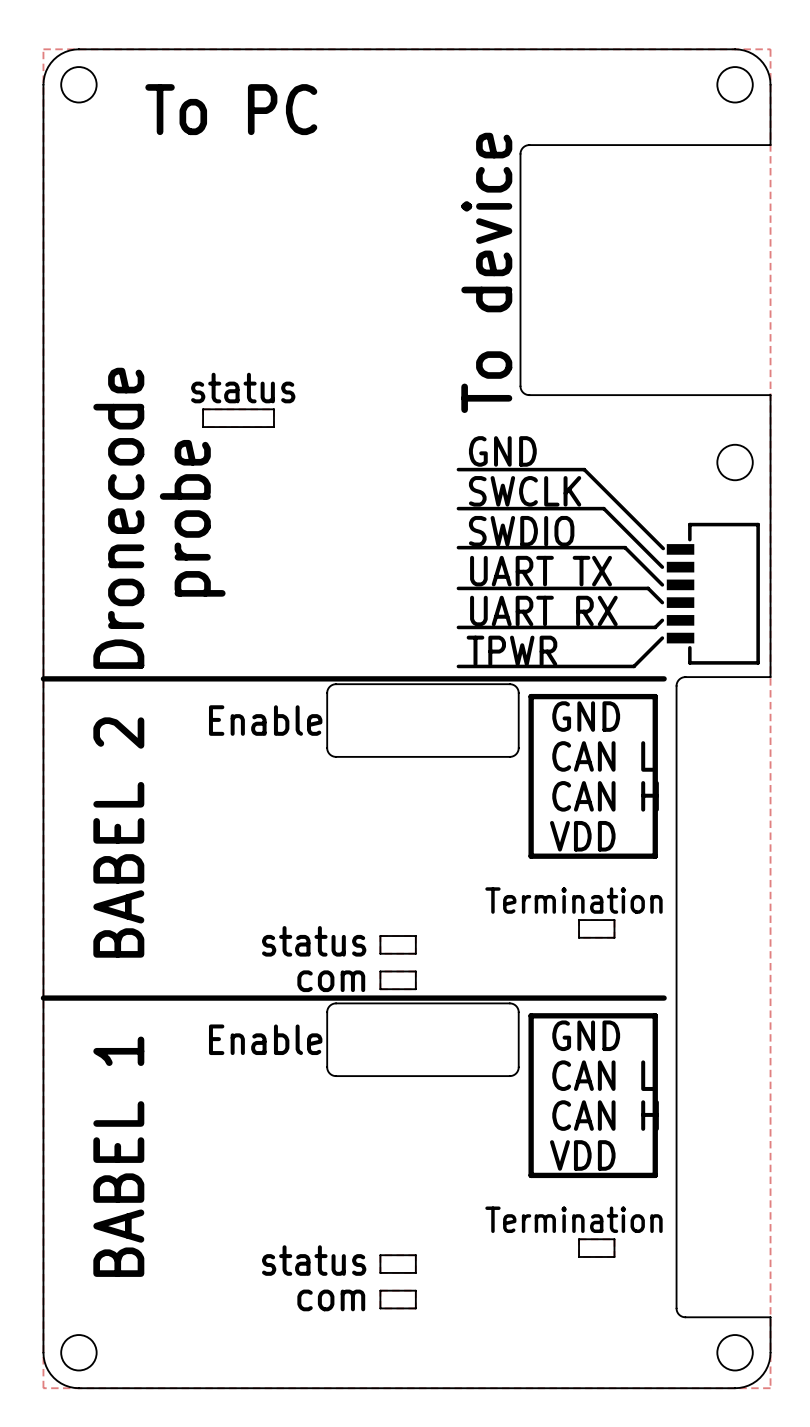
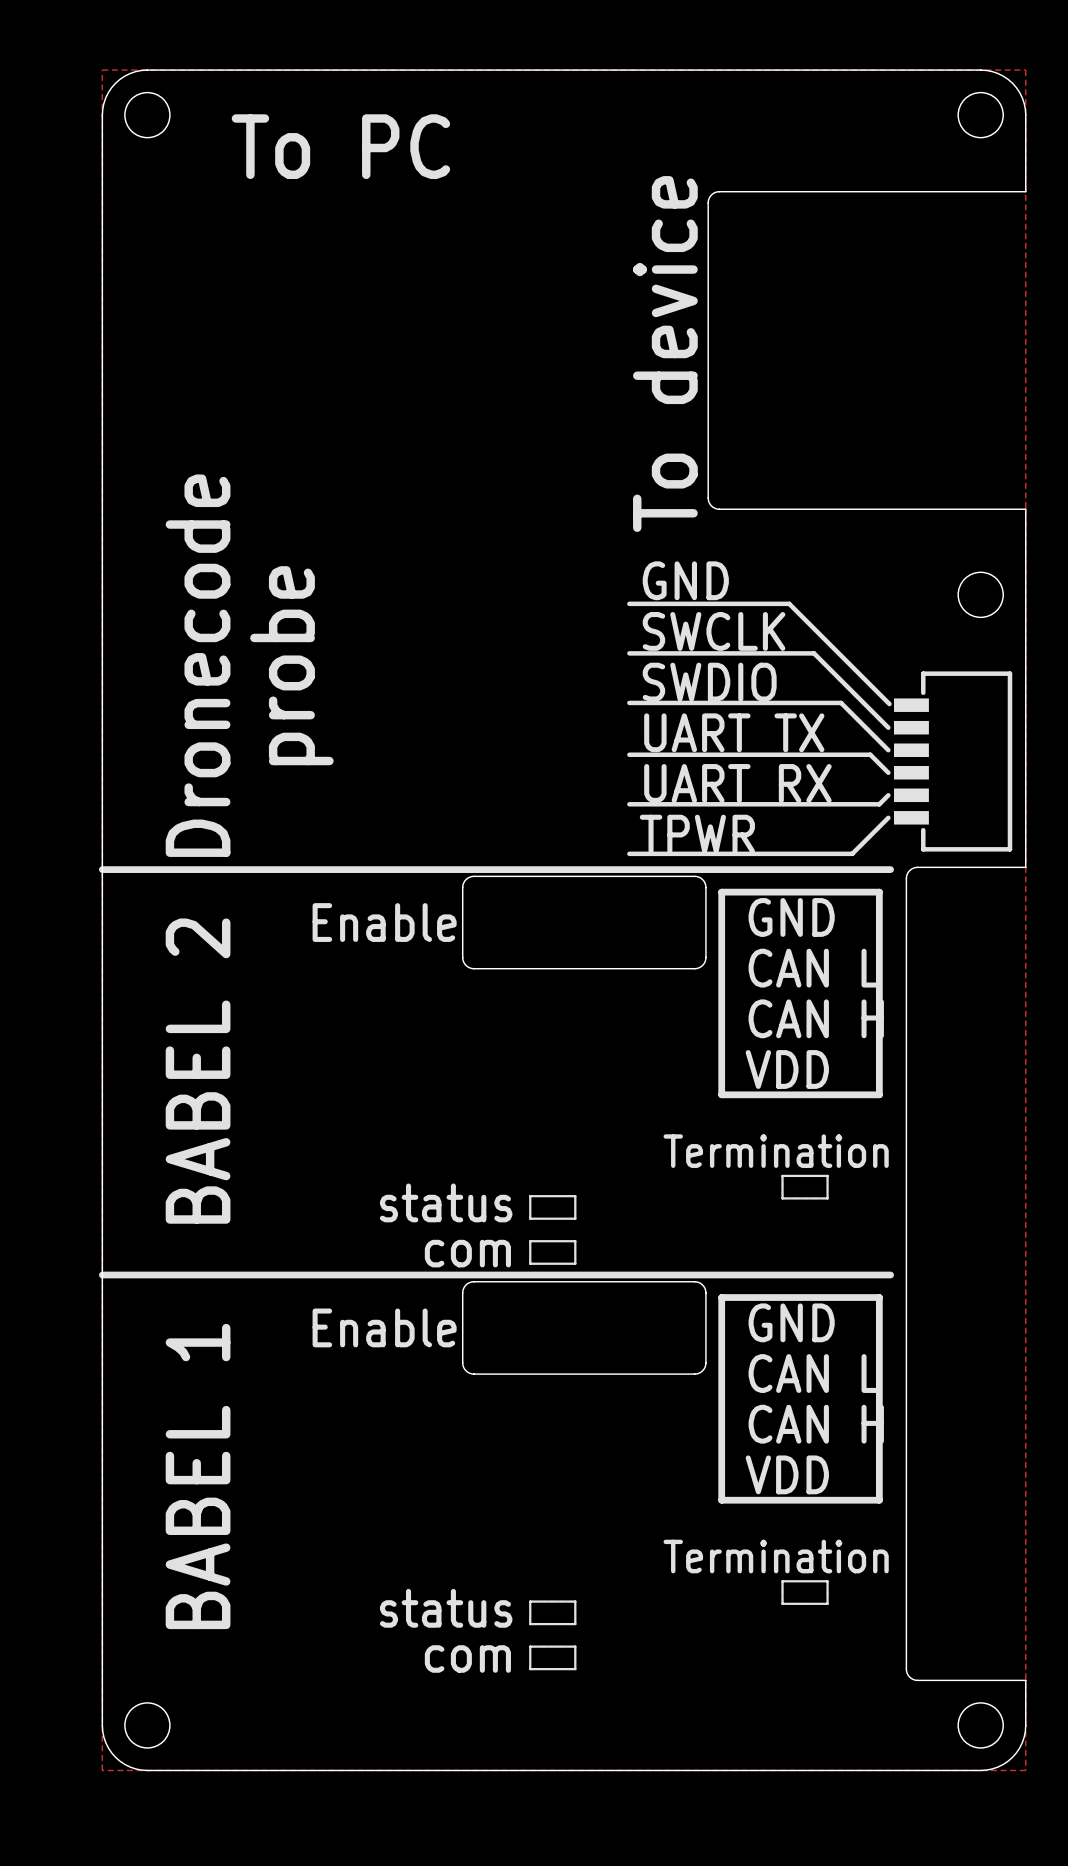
text: status (243, 388) -> none
line: (203, 409) (273, 409) (273, 427) (203, 427) (203, 409) -> none

